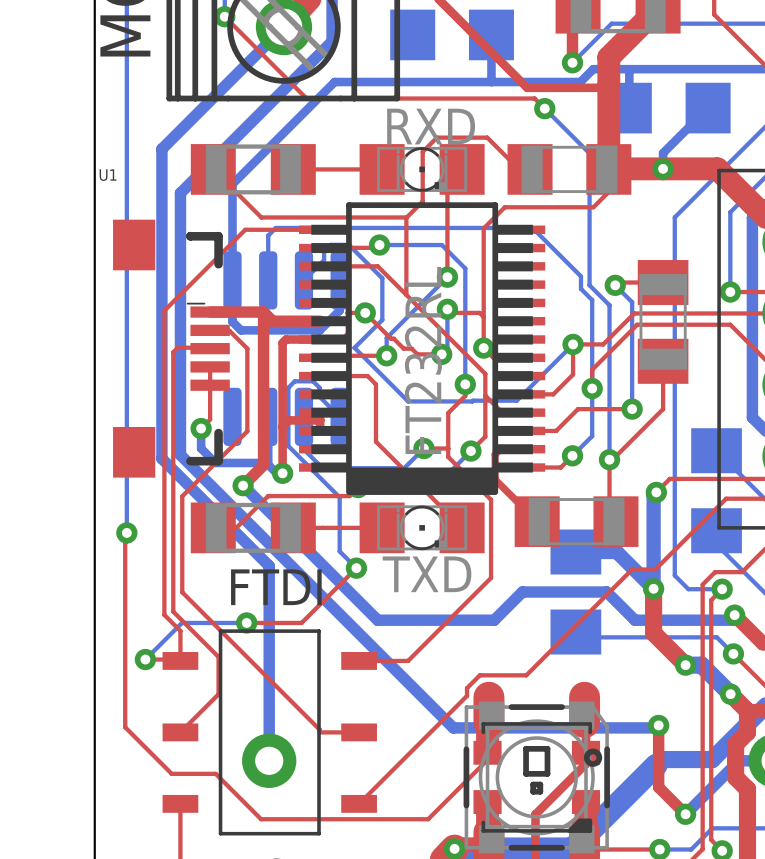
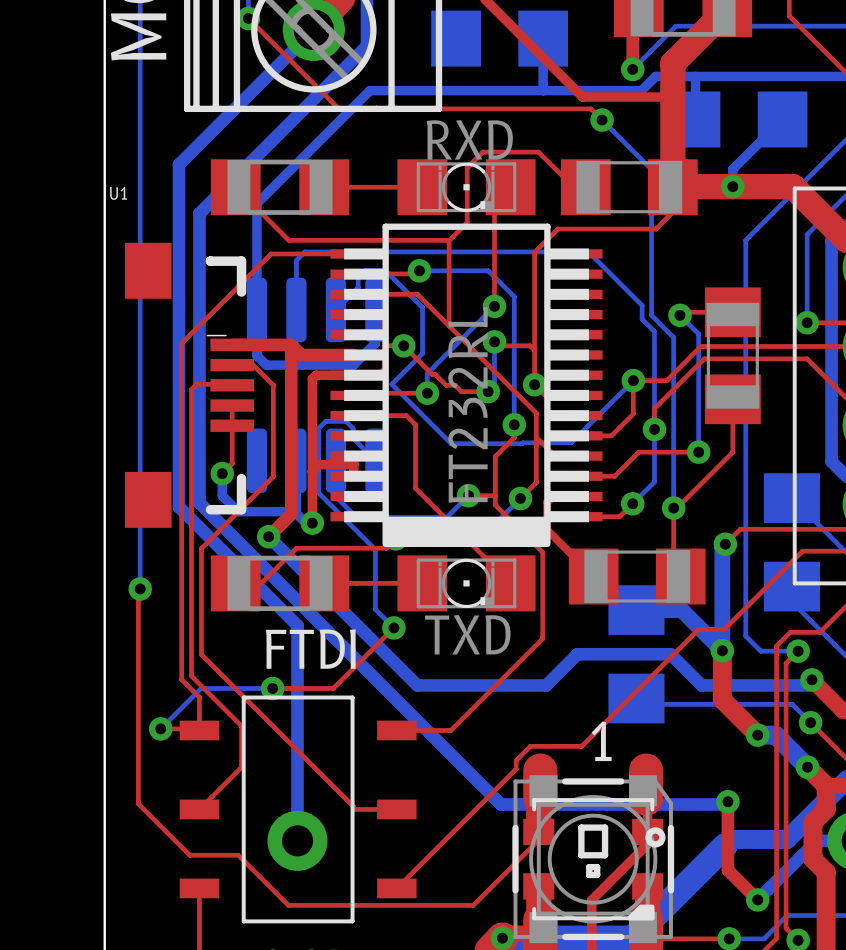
text: none -> 1 (601, 741)

